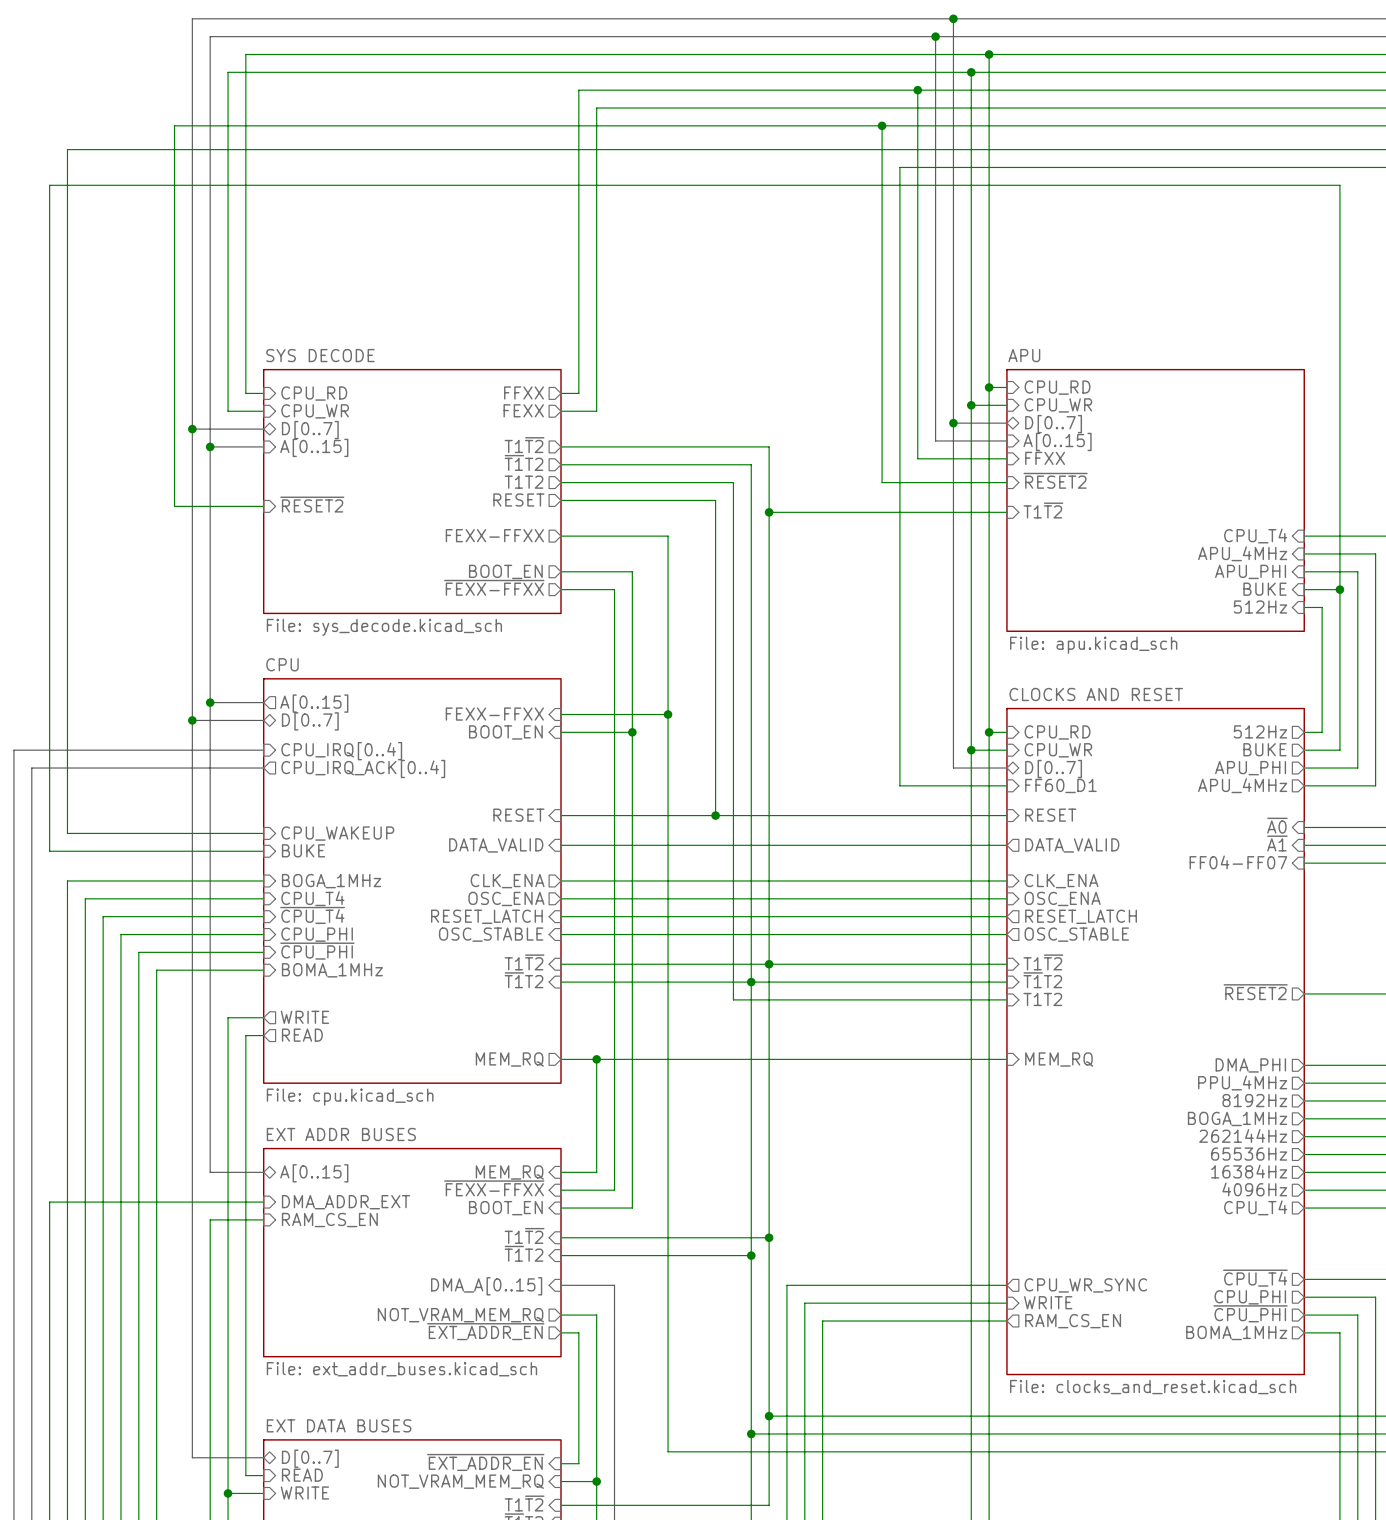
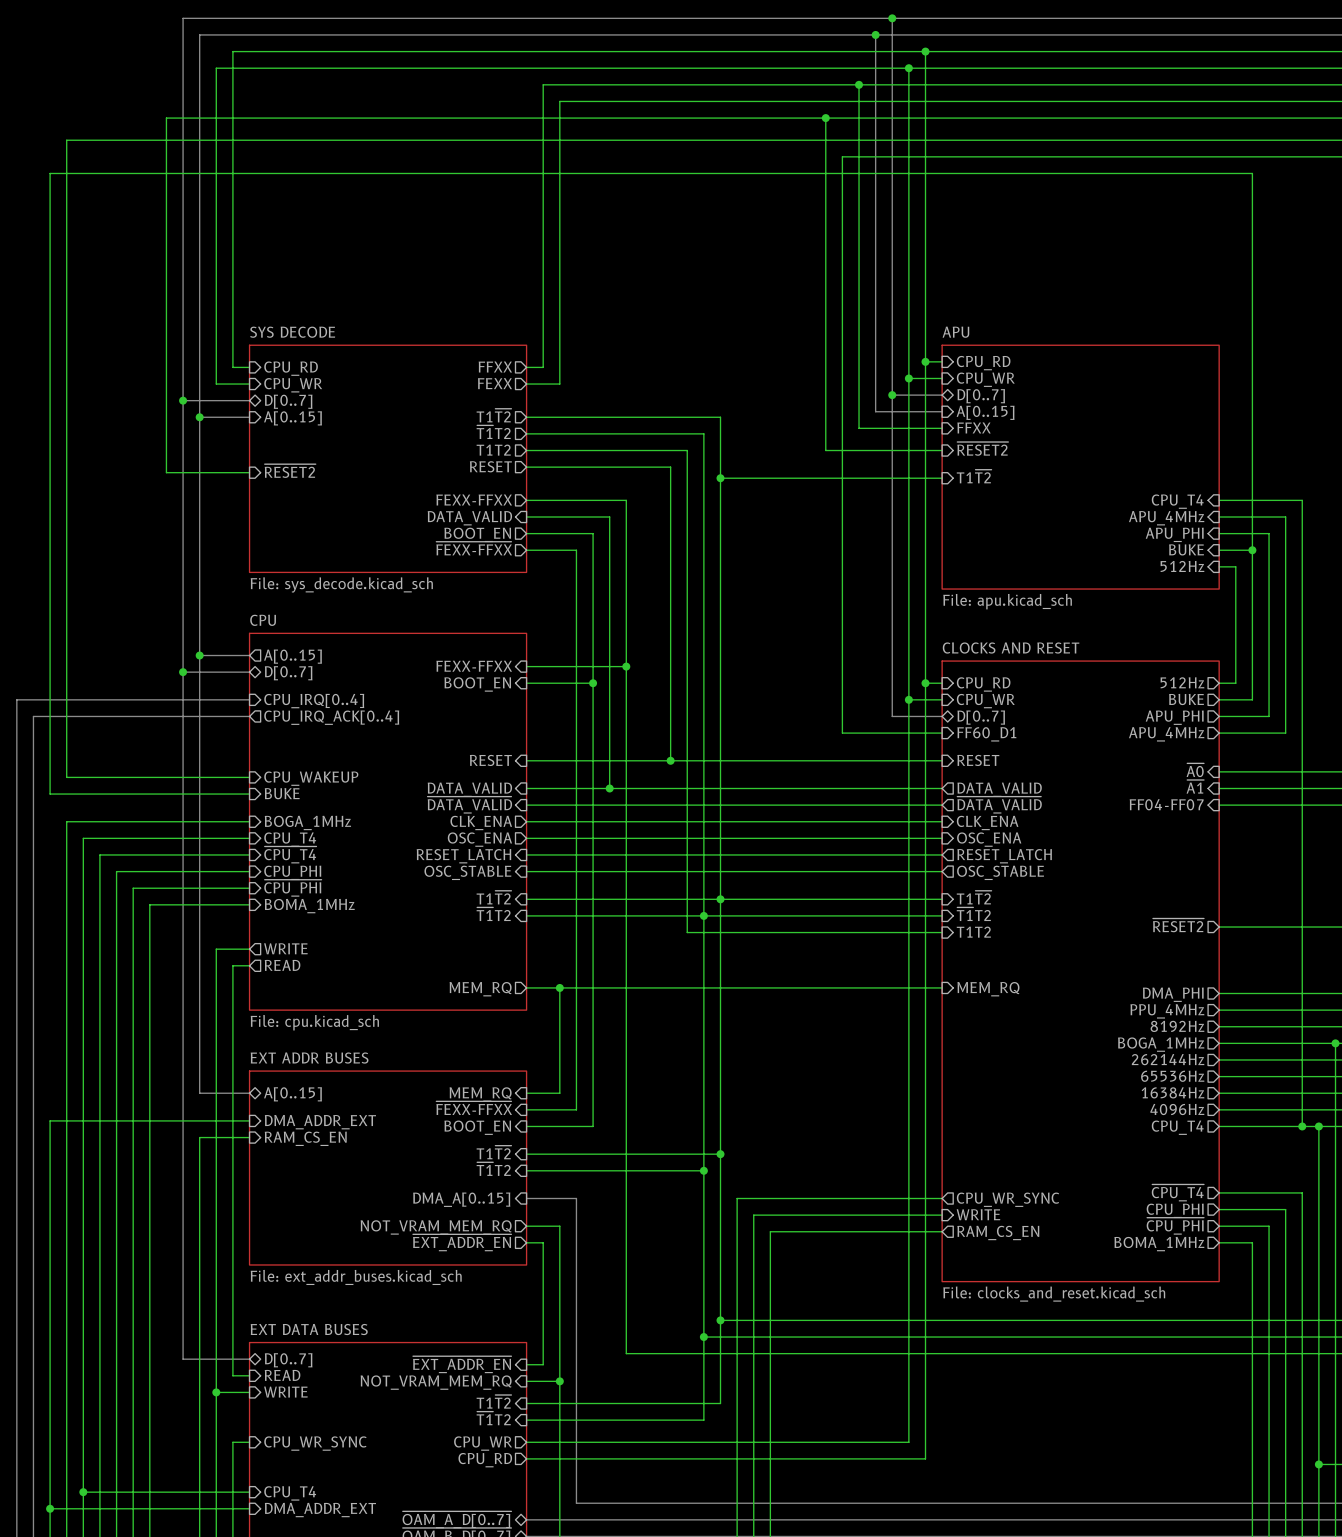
wire: none -> (526, 517) (609, 517) (609, 788)
sheet pin: none -> DATA_VALID (469, 518)
junction: none -> (609, 788)
sheet pin: none -> ~{DATA_VALID} (469, 805)
sheet pin: none -> ~{DATA_VALID} (999, 805)
wire: none -> (526, 805) (942, 805)

